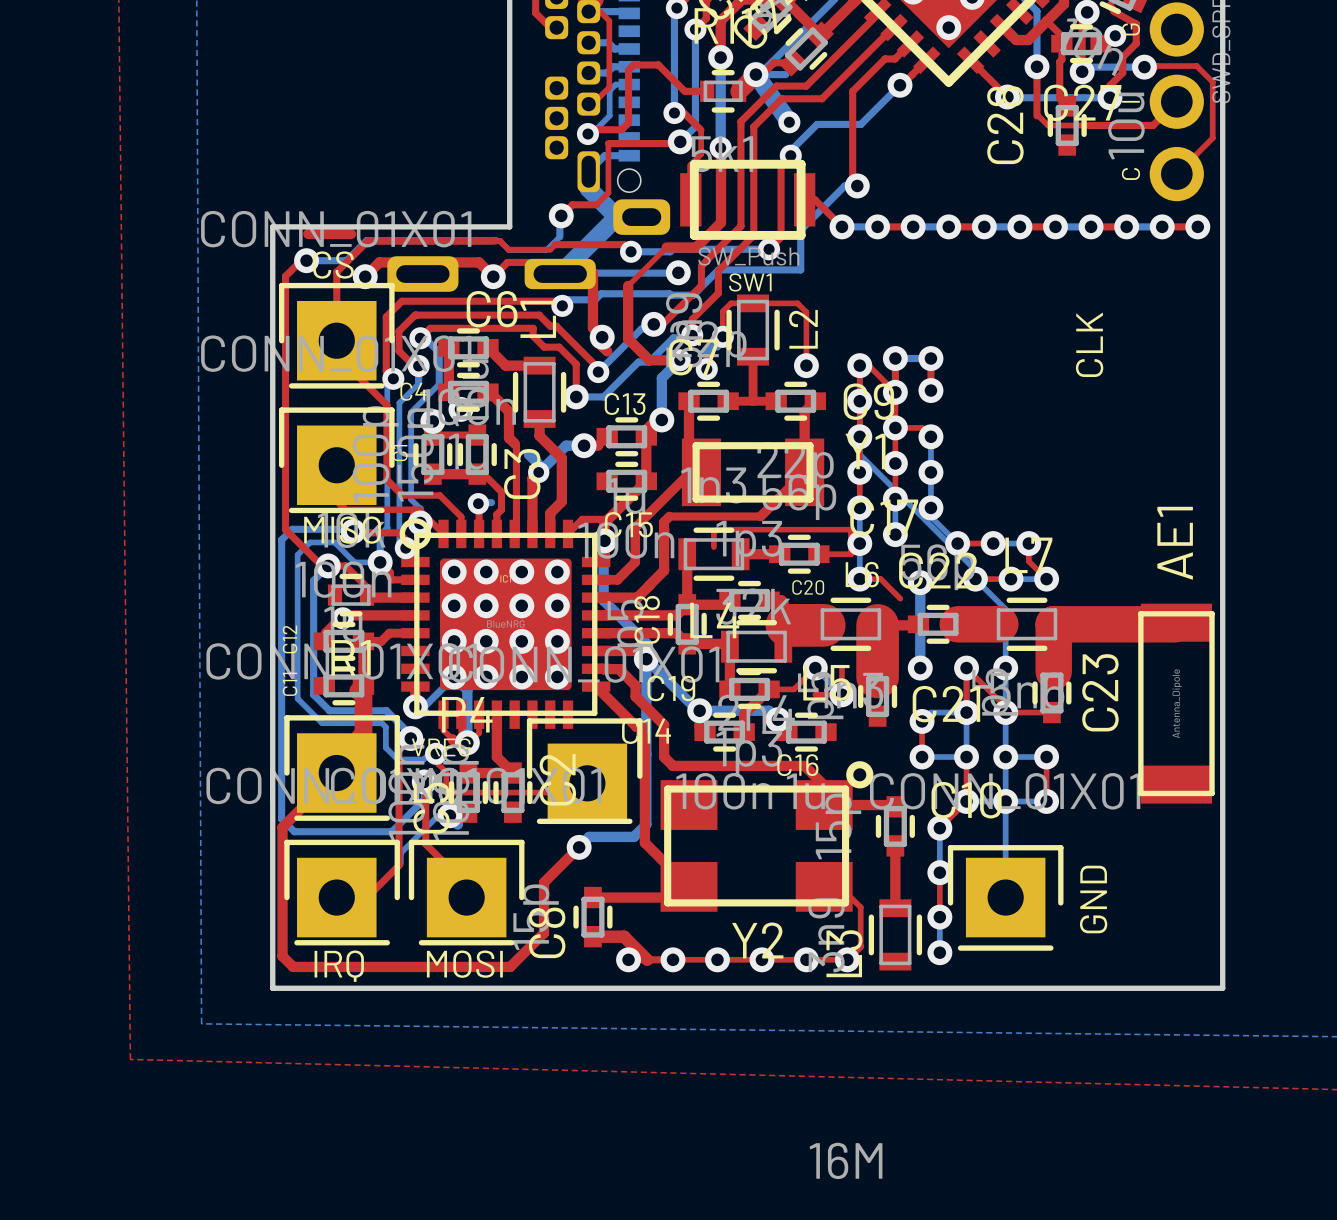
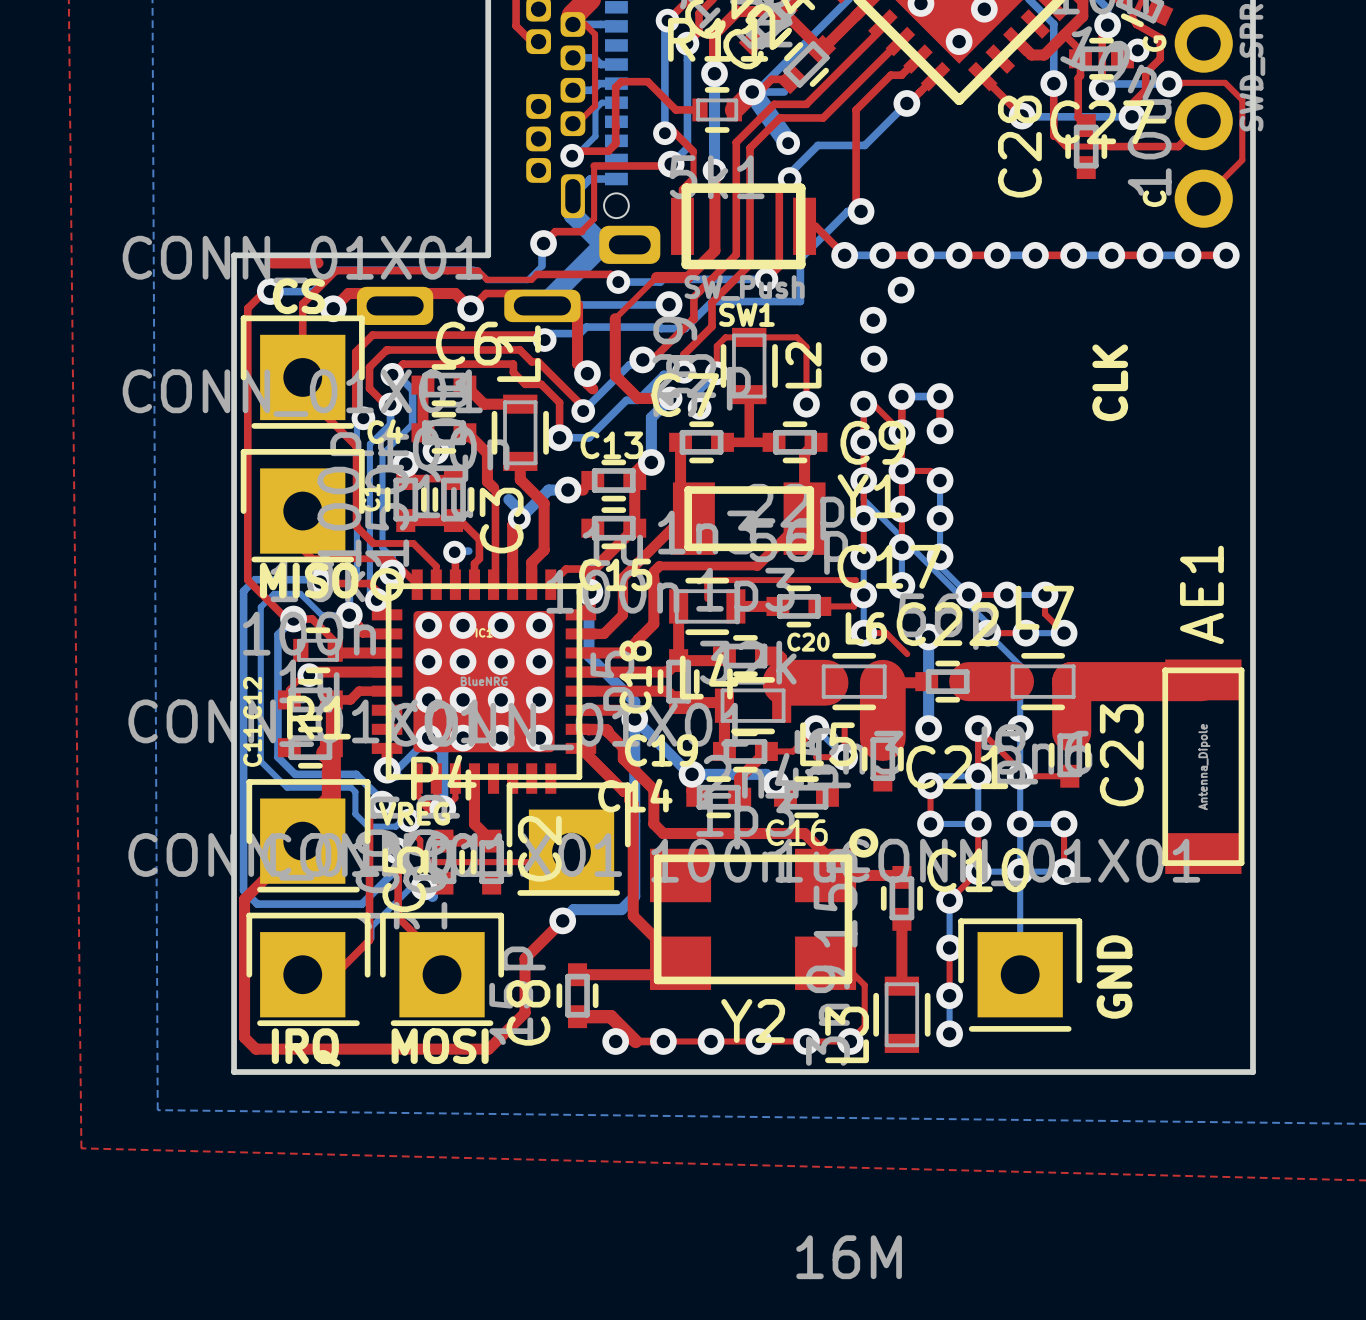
via: none -> (901, 290)
via: none -> (873, 320)
via: none -> (874, 359)

